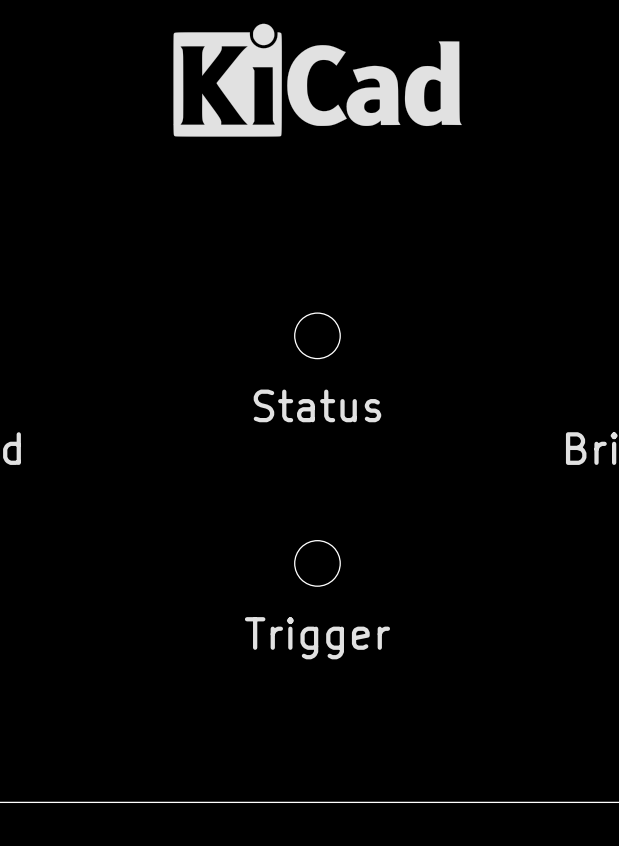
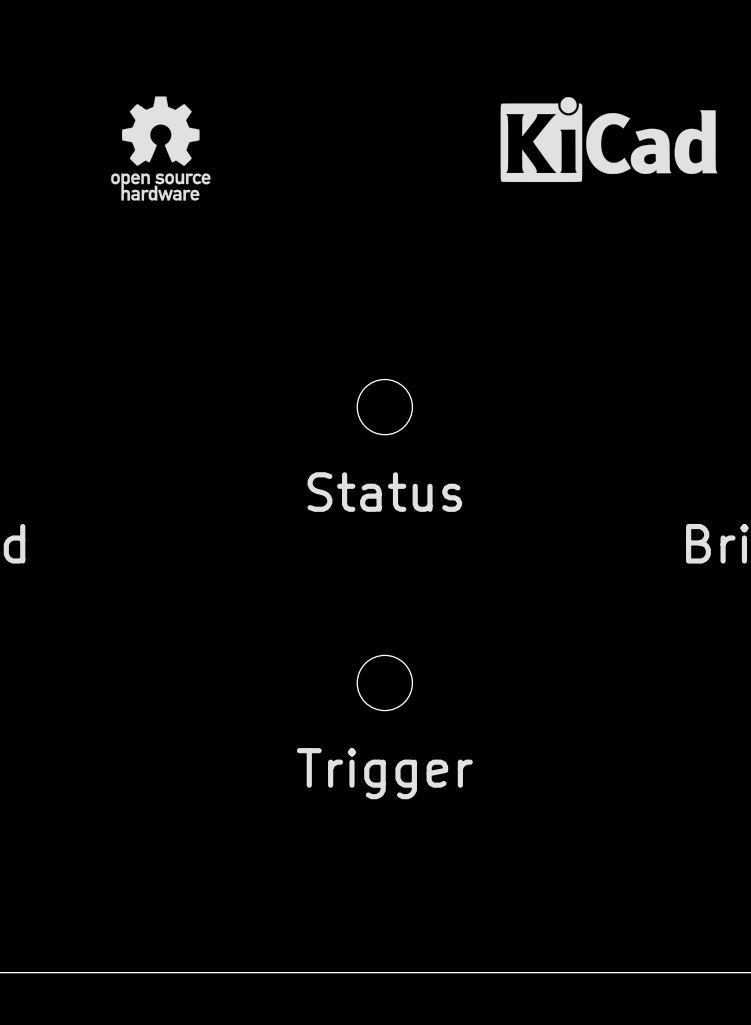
drawing: [173, 23, 462, 137] -> none
drawing: none -> [111, 96, 211, 201]
drawing: none -> [500, 97, 718, 183]

